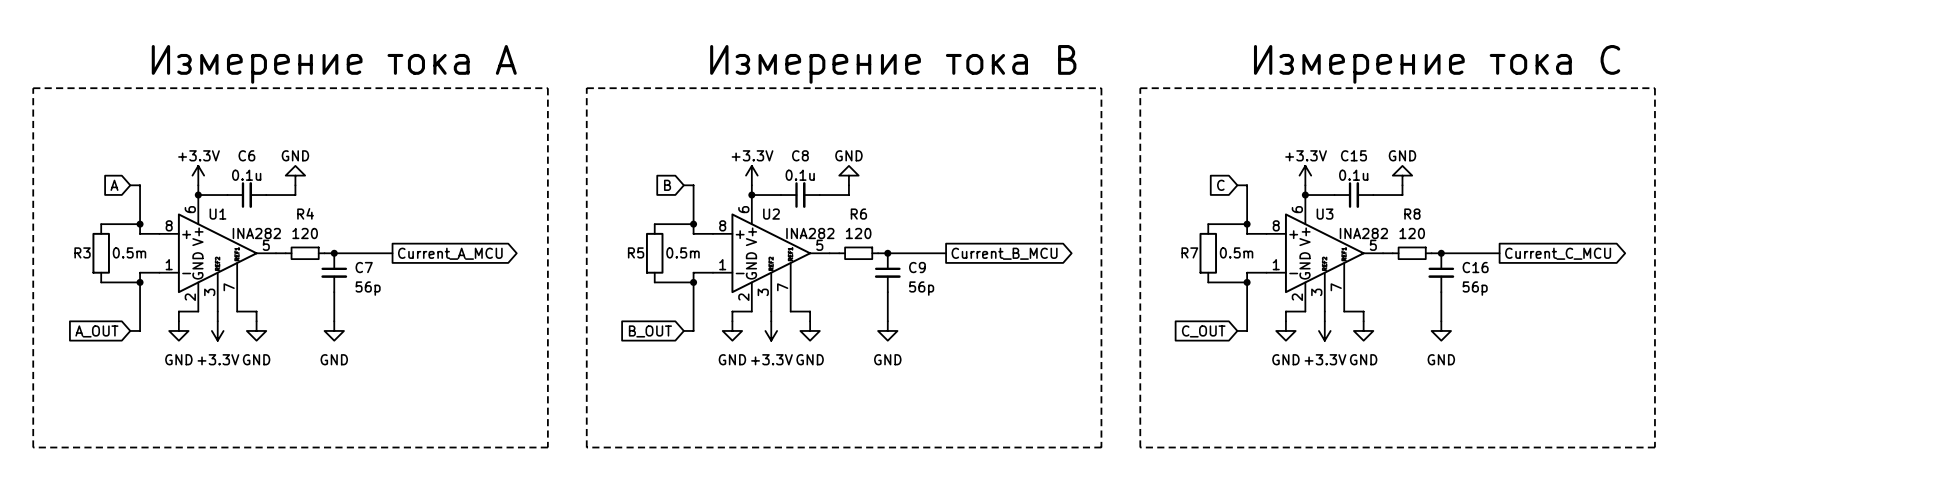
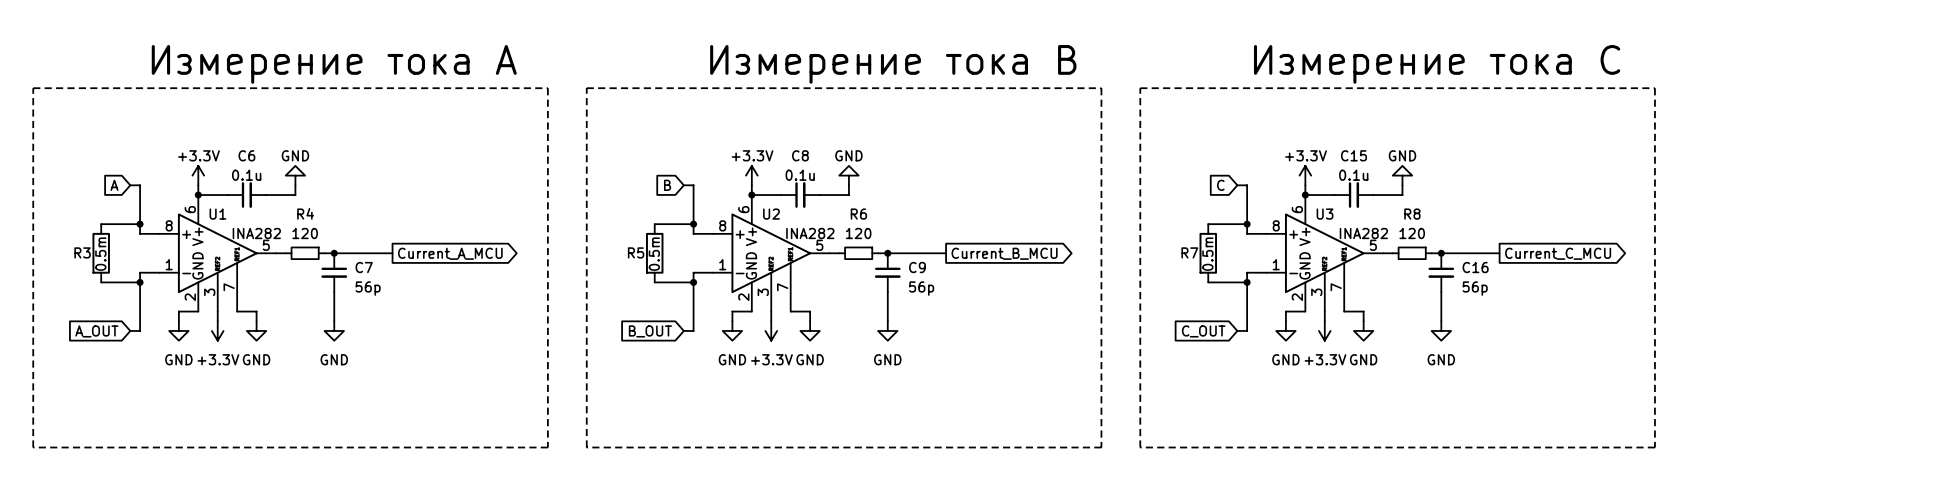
R3 value rotation: 0° (129, 252) -> 90° counterclockwise (100, 254)
R5 value rotation: 0° (683, 252) -> 90° counterclockwise (654, 254)
R7 value rotation: 0° (1236, 252) -> 90° counterclockwise (1207, 254)

